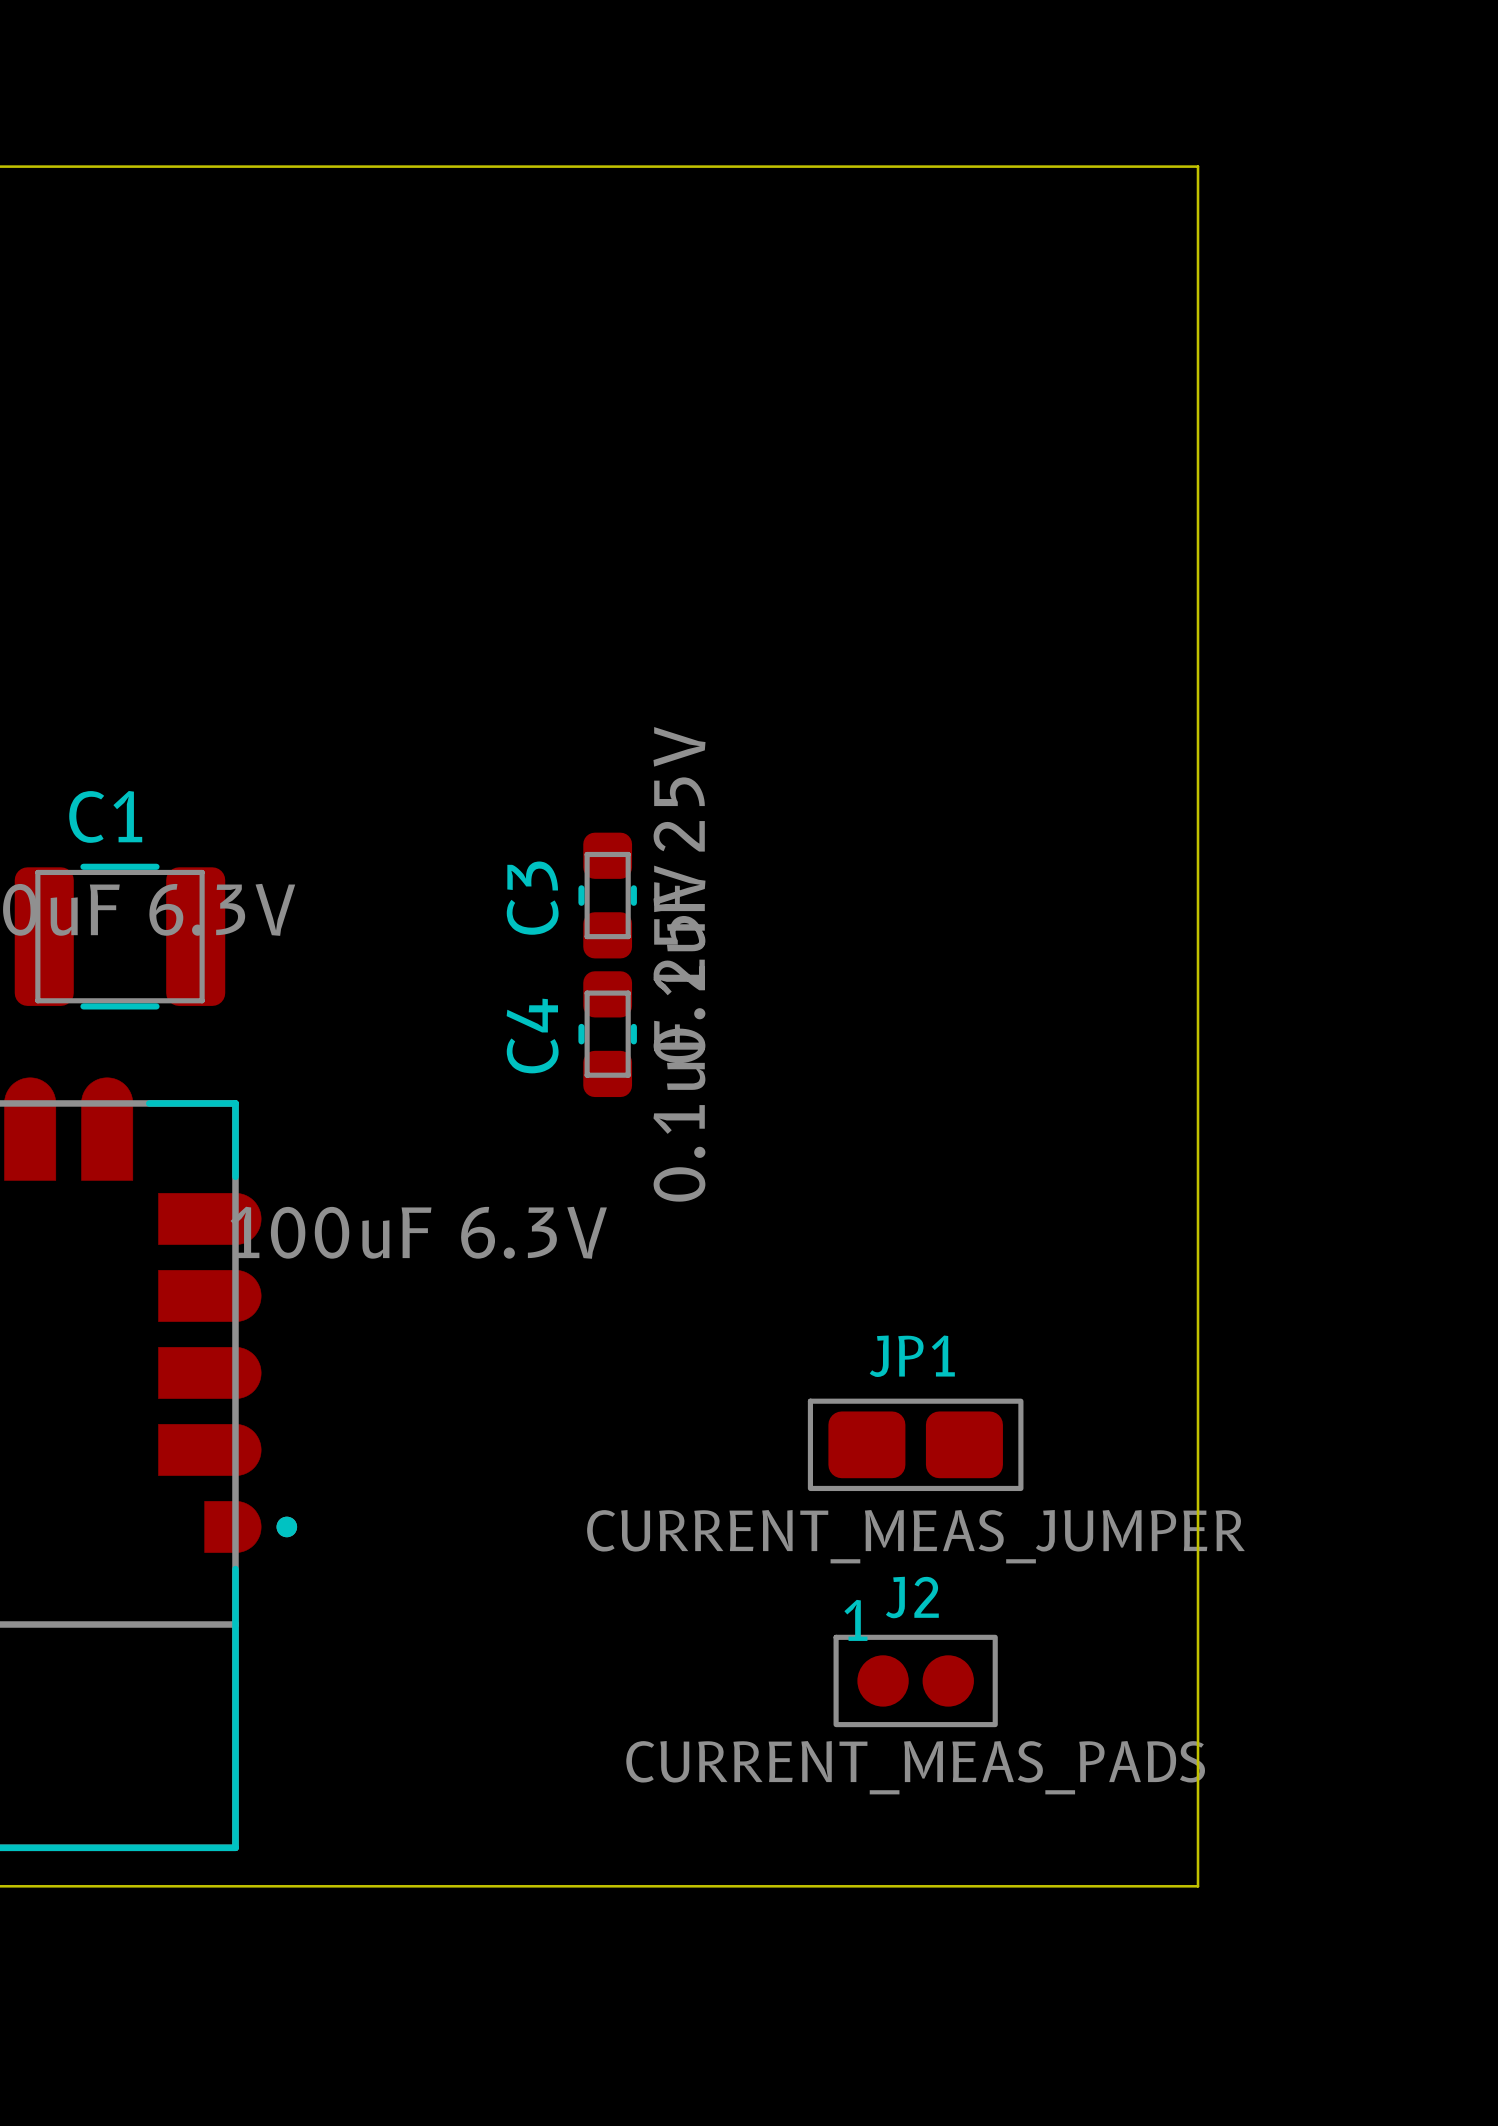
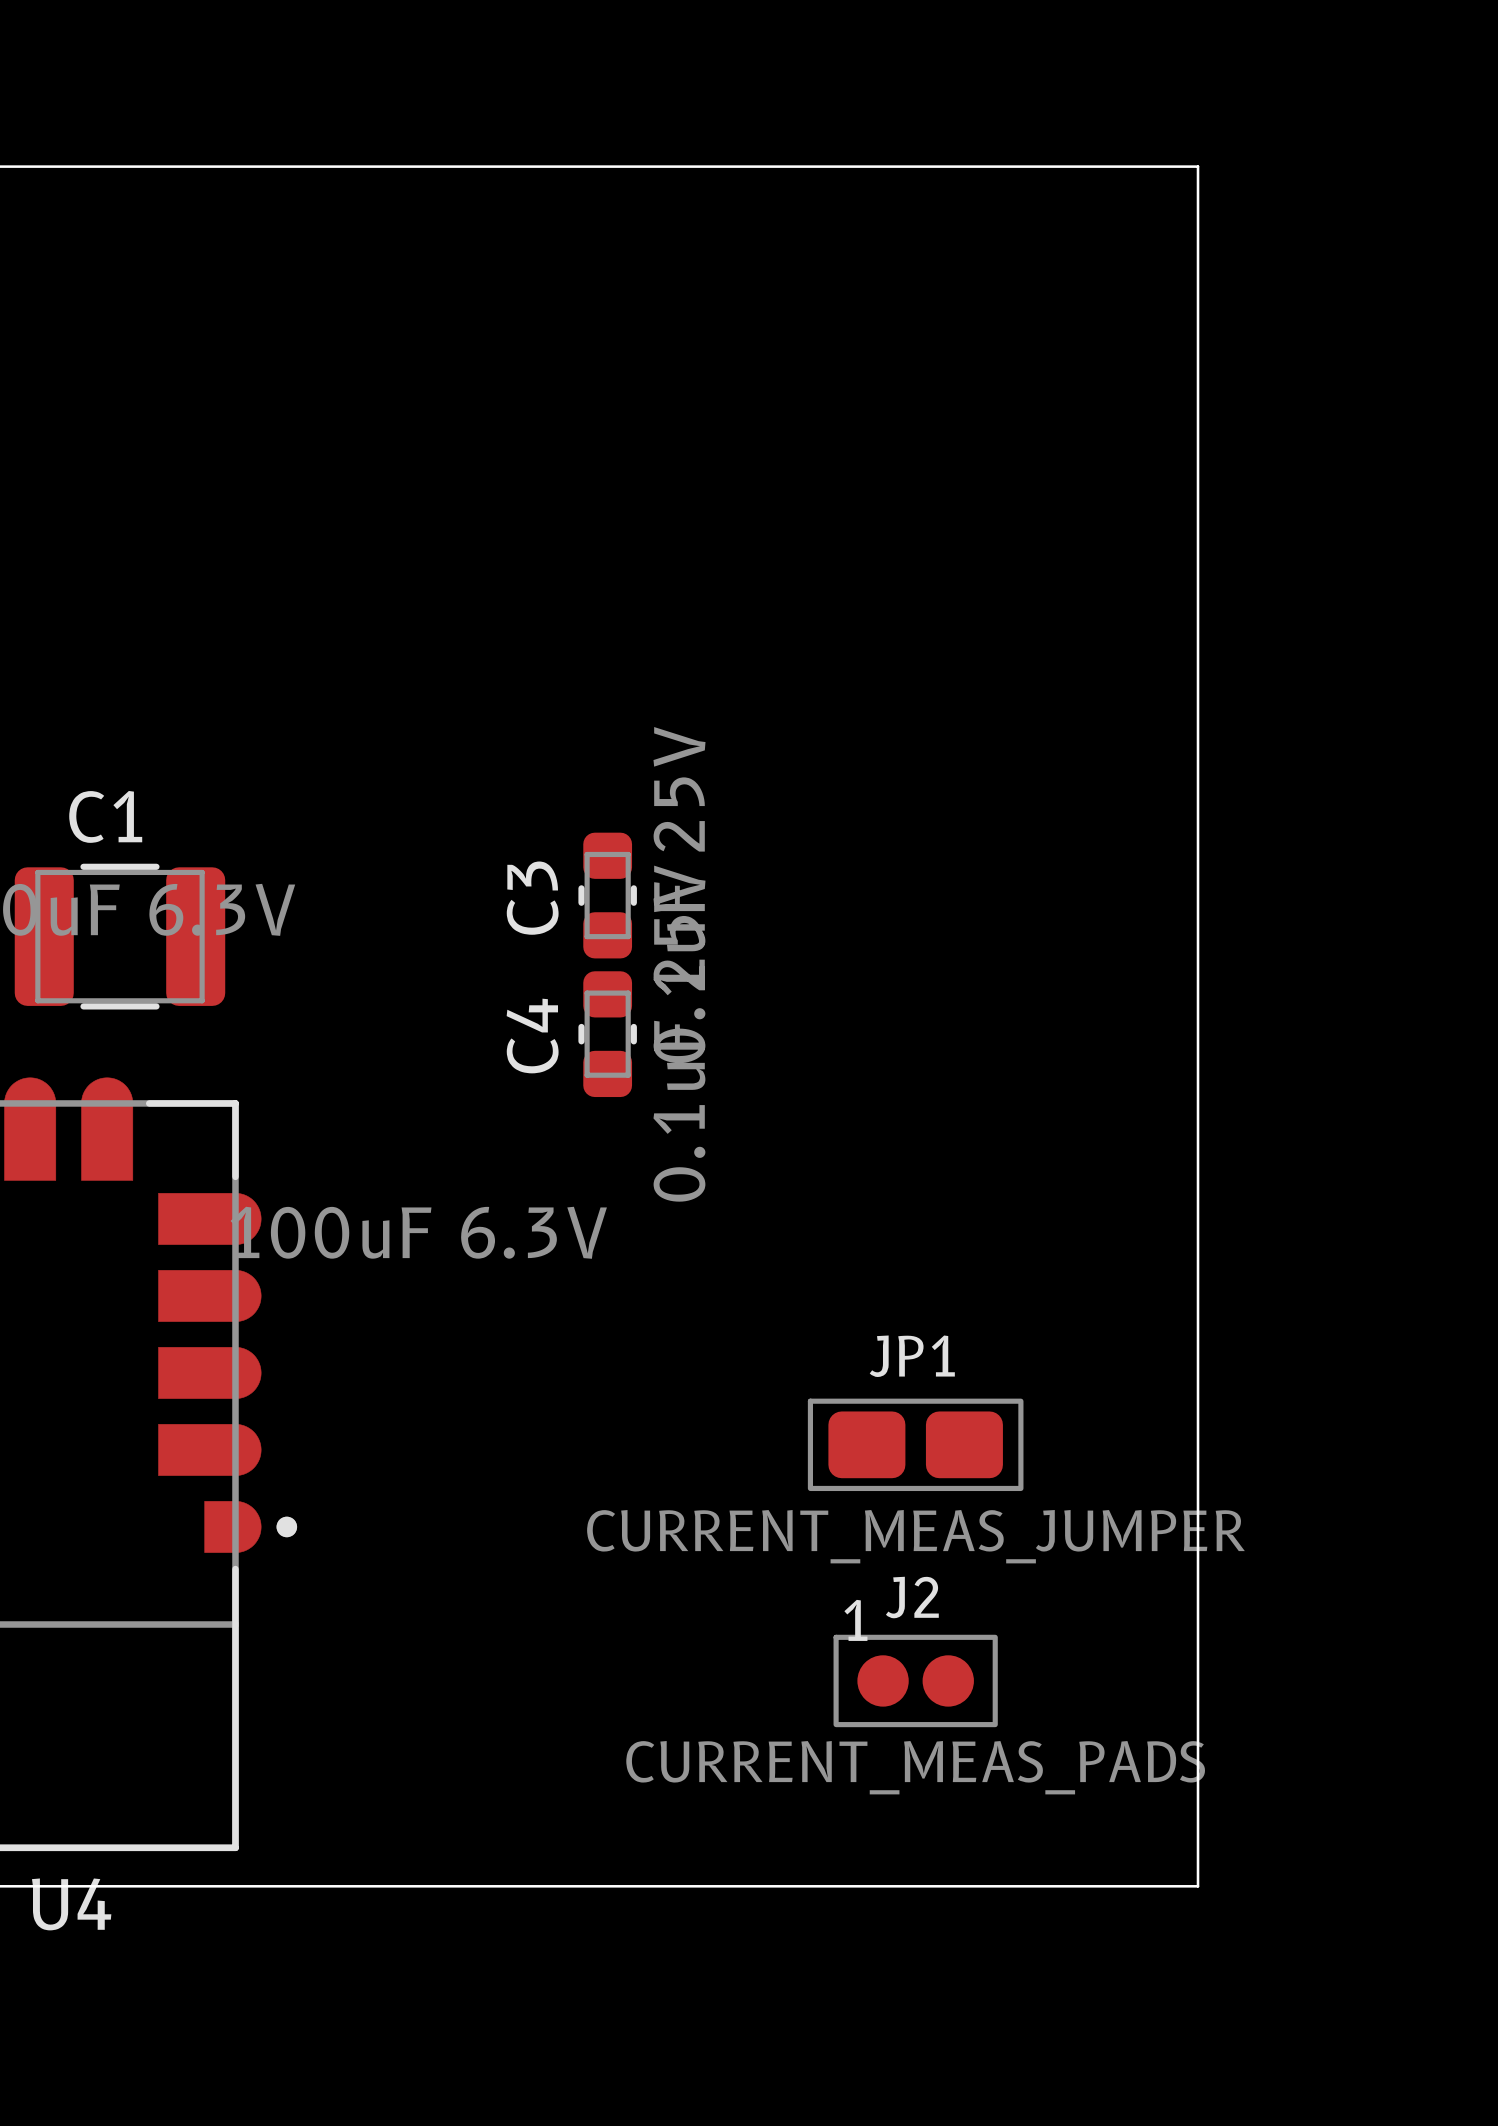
U4 name: none -> U4 (71, 1904)

